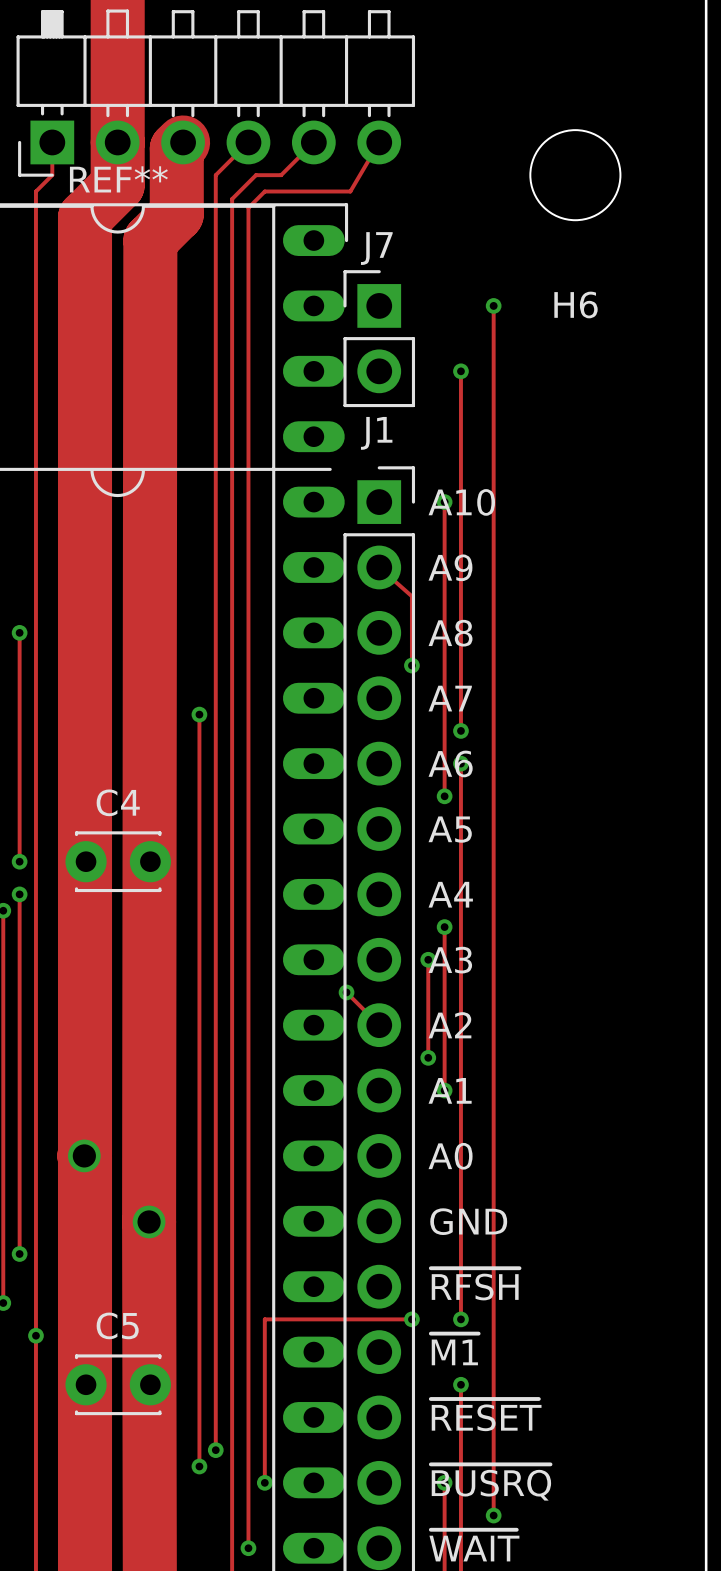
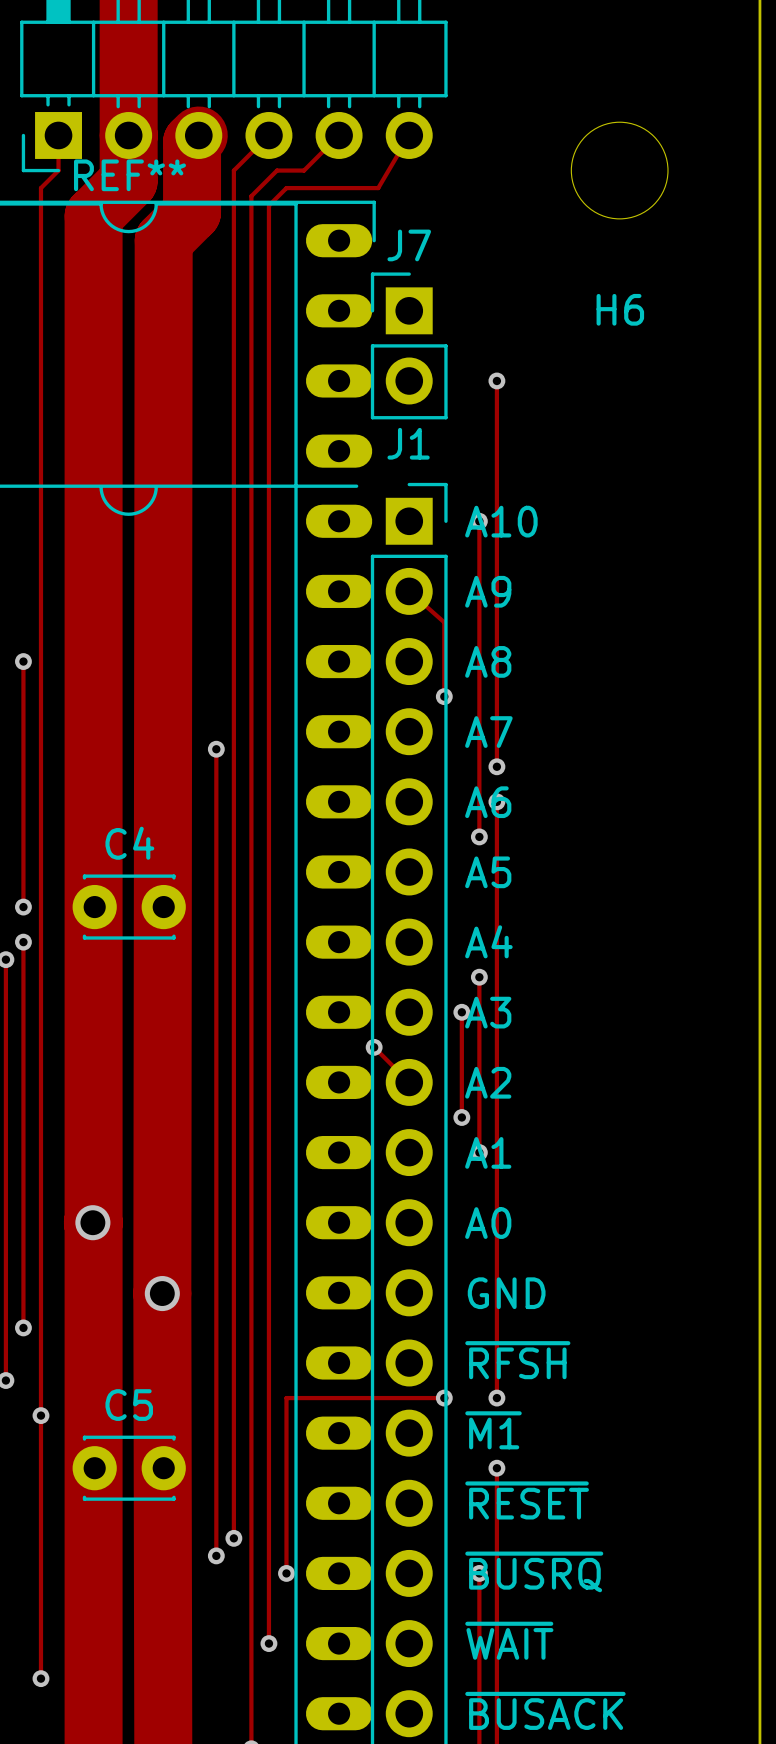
track: (493, 305) (493, 1515) -> none
via: (493, 305) -> none
via: (493, 1515) -> none

